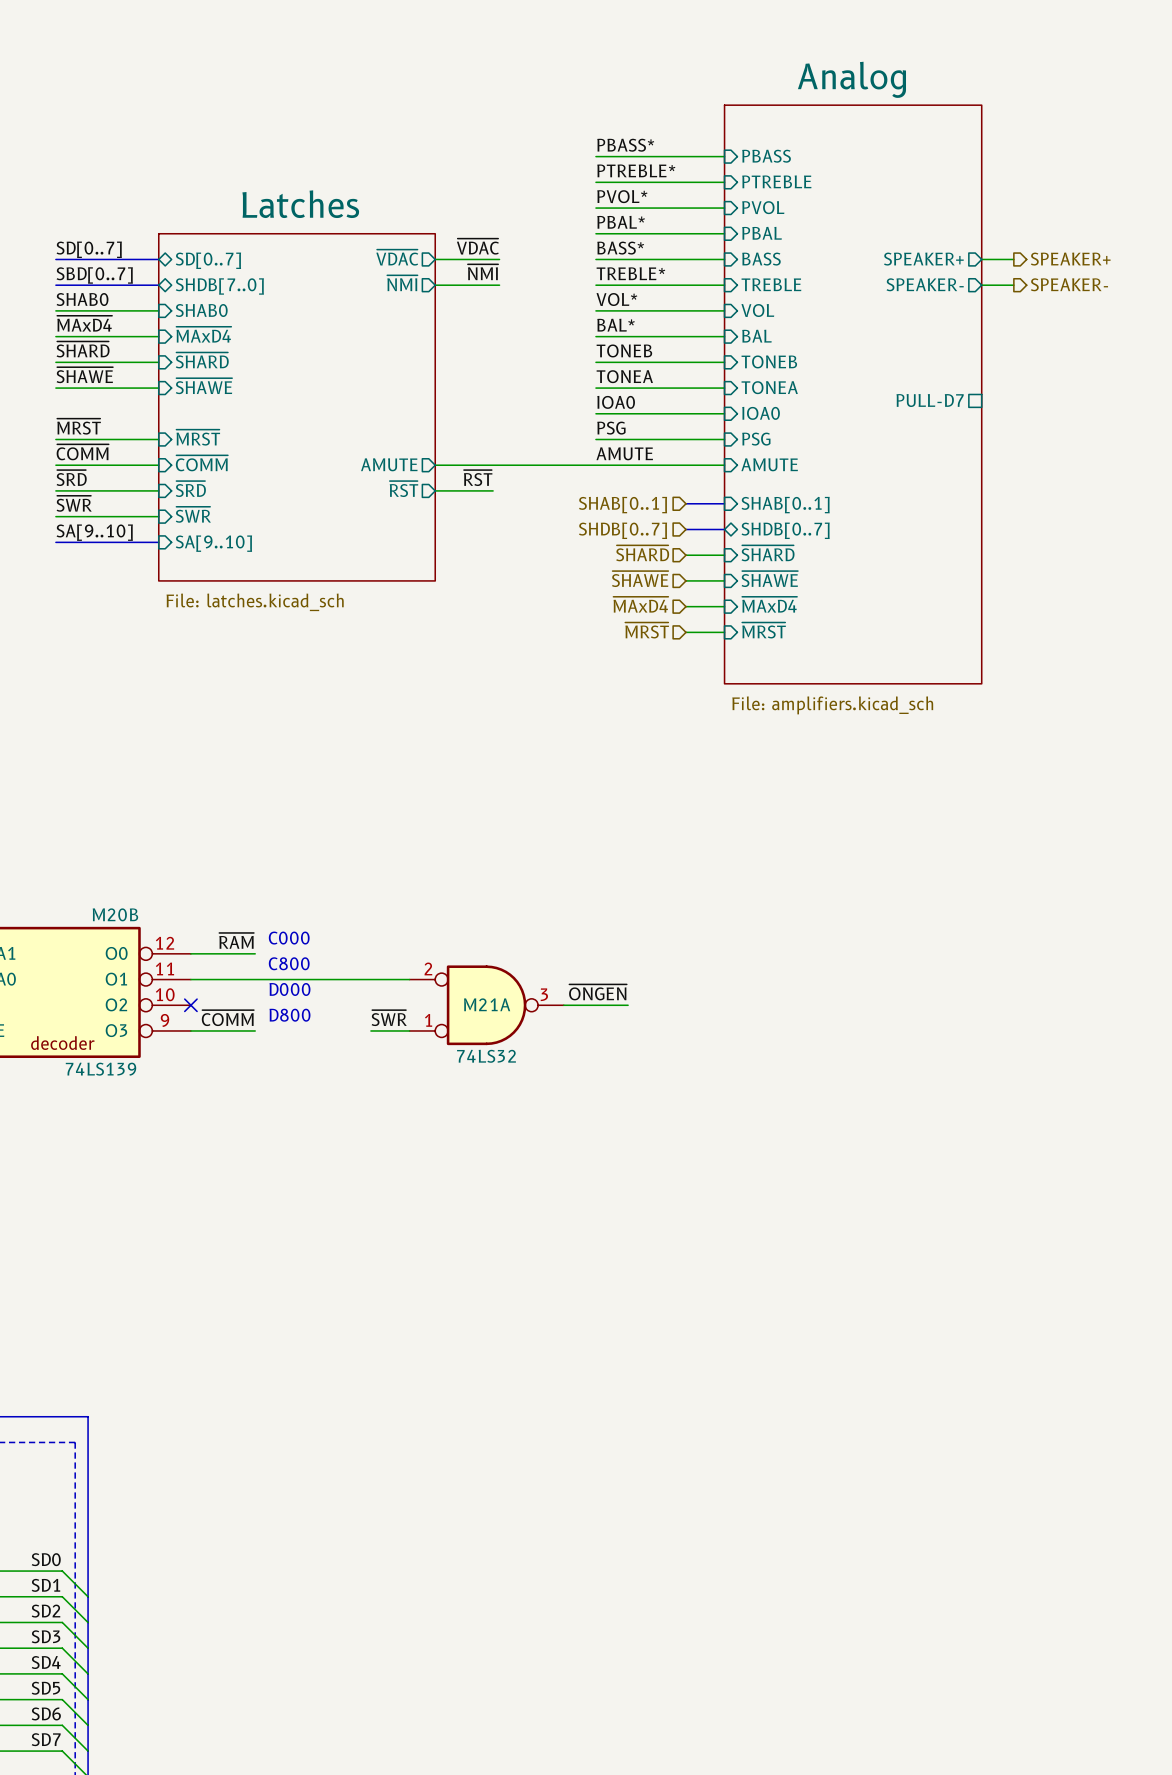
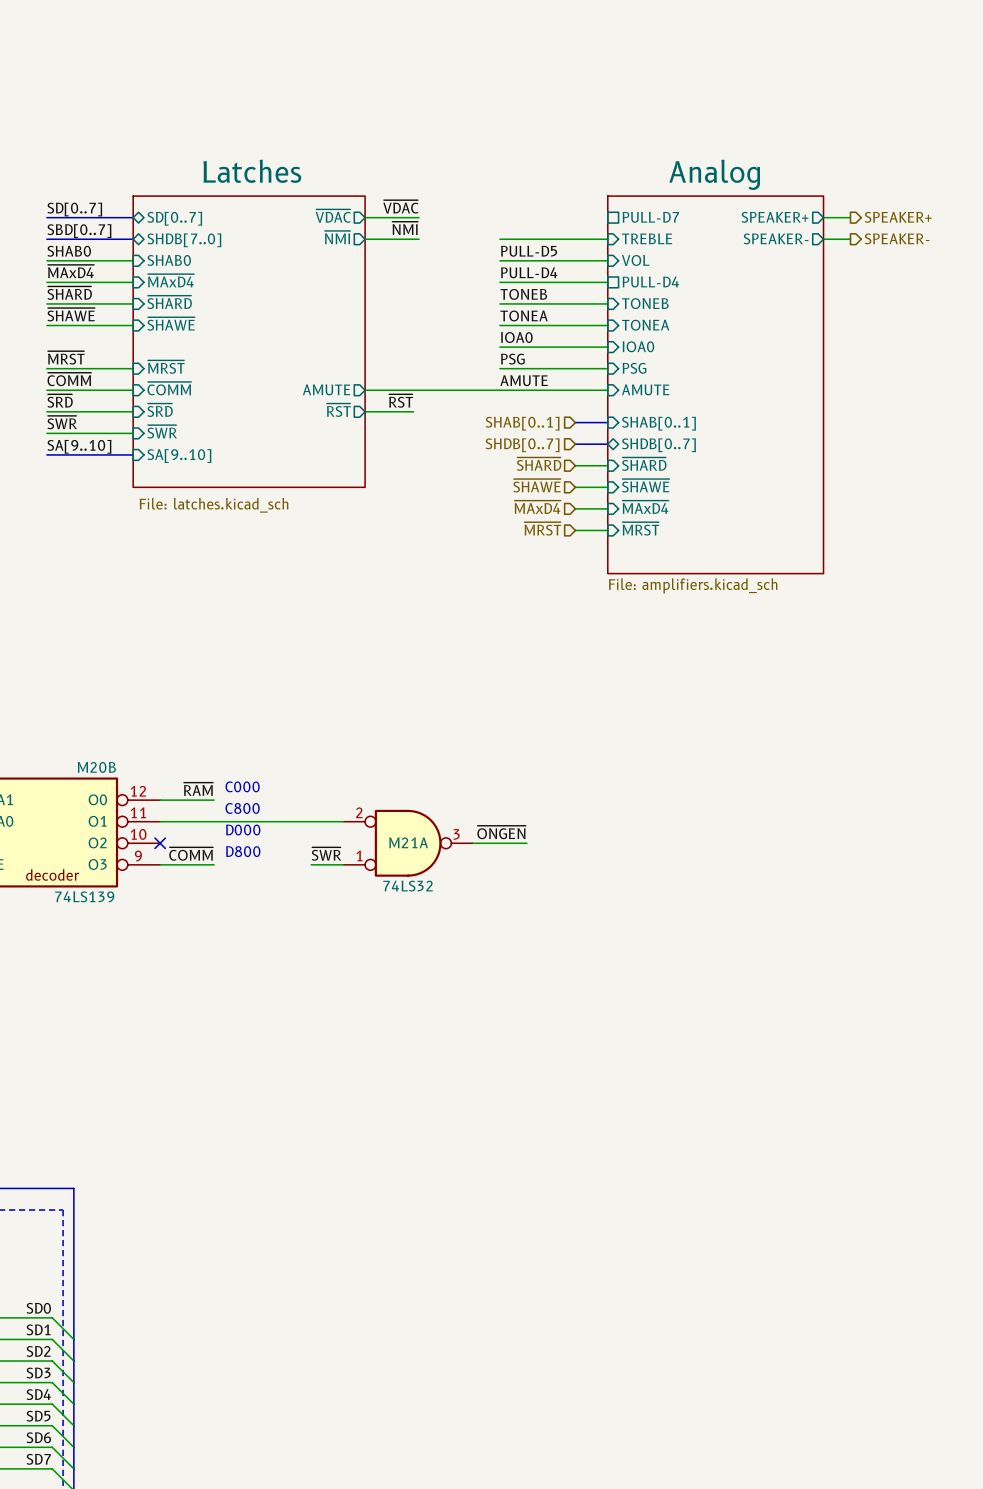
label: PBASS* (625, 145) -> none
wire: (595, 156) (724, 156) -> none
sheet pin: PBASS (766, 156) -> none
label: PTREBLE* (636, 170) -> none
sheet pin: PTREBLE (776, 181) -> none
wire: (595, 182) (724, 182) -> none
label: PVOL* (622, 196) -> none
sheet pin: PVOL (763, 207) -> none
wire: (595, 208) (724, 208) -> none
label: PBAL* (621, 222) -> none
wire: (595, 233) (724, 233) -> none
sheet pin: PBAL (762, 233) -> none
label: BASS* (620, 248) -> none
wire: (595, 259) (724, 259) -> none
sheet pin shape: input (761, 259) -> passive (650, 217)
sheet pin: BASS (761, 259) -> PULL-D7 (650, 217)
label: TREBLE* (630, 273) -> none
label: VOL* (616, 299) -> PULL-D5 (529, 251)
label: BAL* (616, 325) -> PULL-D4 (529, 272)
sheet pin shape: input (756, 336) -> passive (650, 282)
sheet pin: BAL (756, 336) -> PULL-D4 (650, 282)
sheet Analog: File: amplifiers.kicad_sch (853, 394) -> none
sheet pin: PULL-D7 (930, 400) -> none
sheet Analog: none -> File: amplifiers.kicad_sch (715, 384)

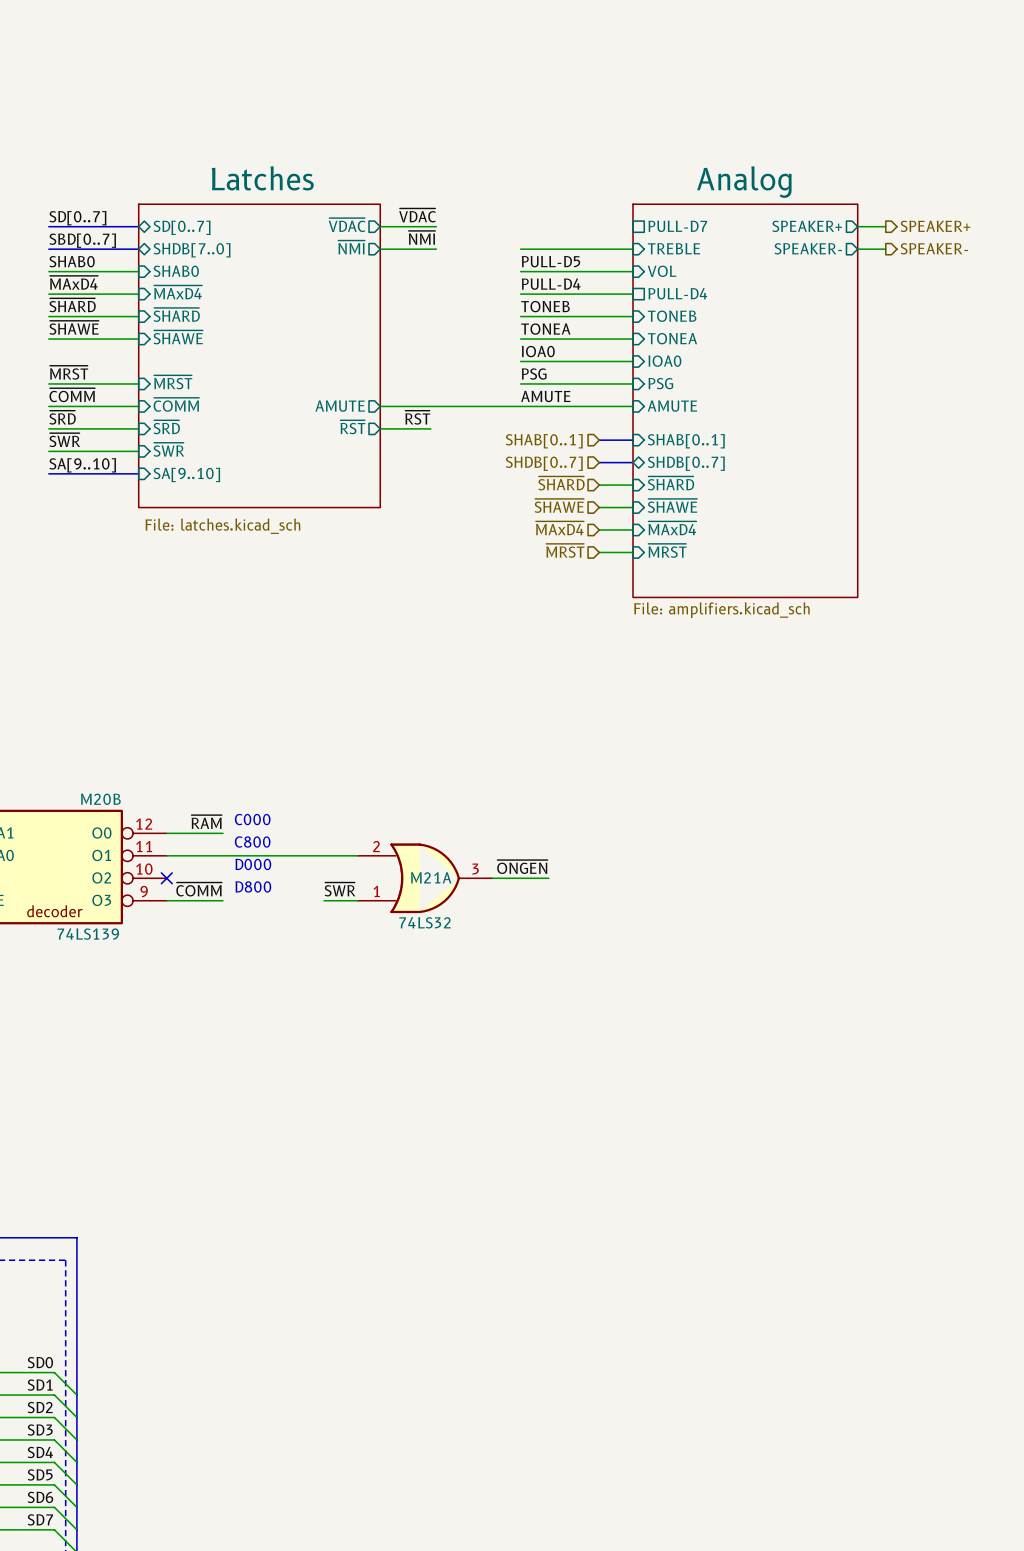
M21A symbol: [343, 809, 473, 877] -> [357, 843, 493, 914]

